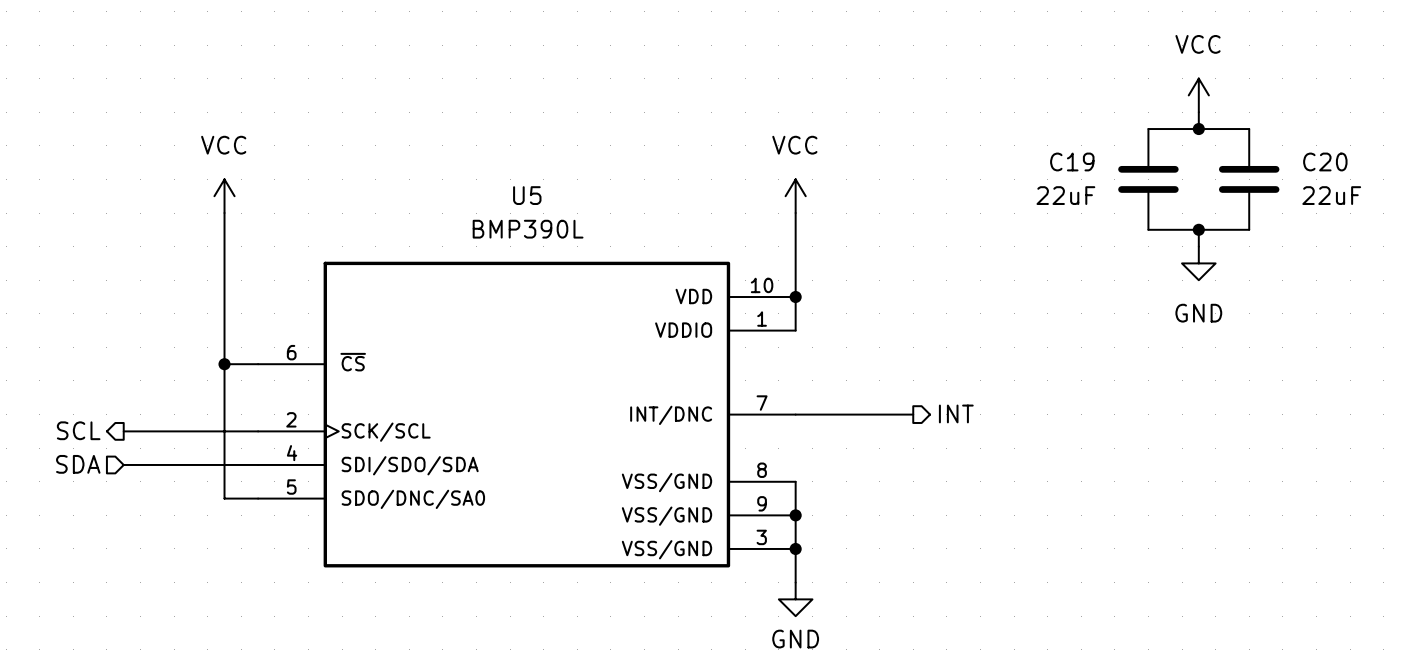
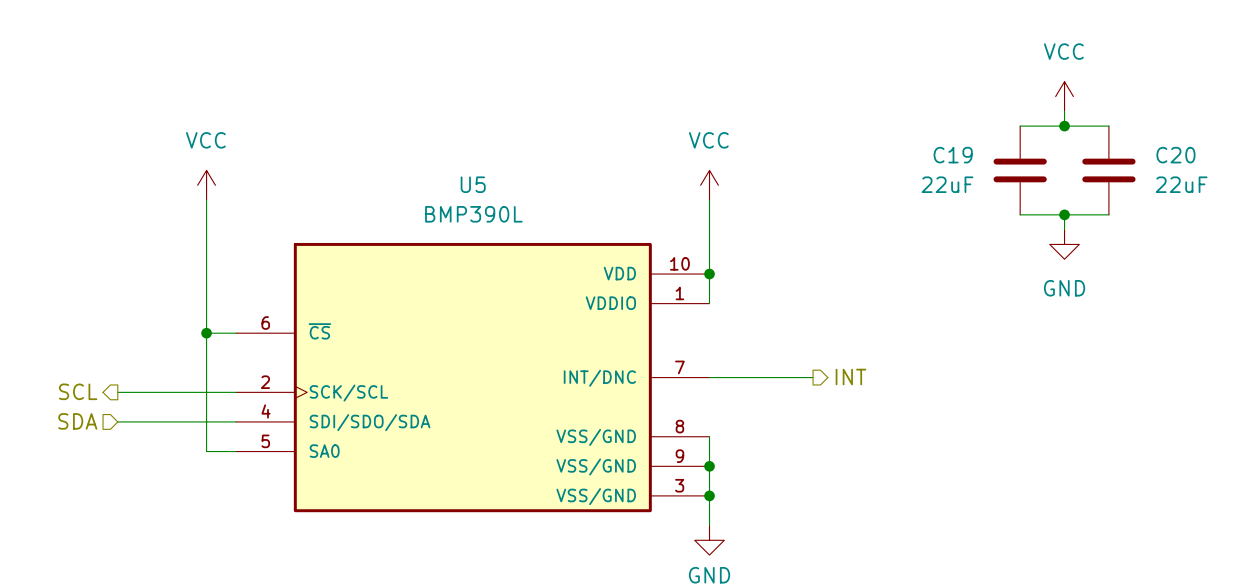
U5 pin name: SDO/DNC/SA0 (413, 499) -> SA0 (324, 451)

